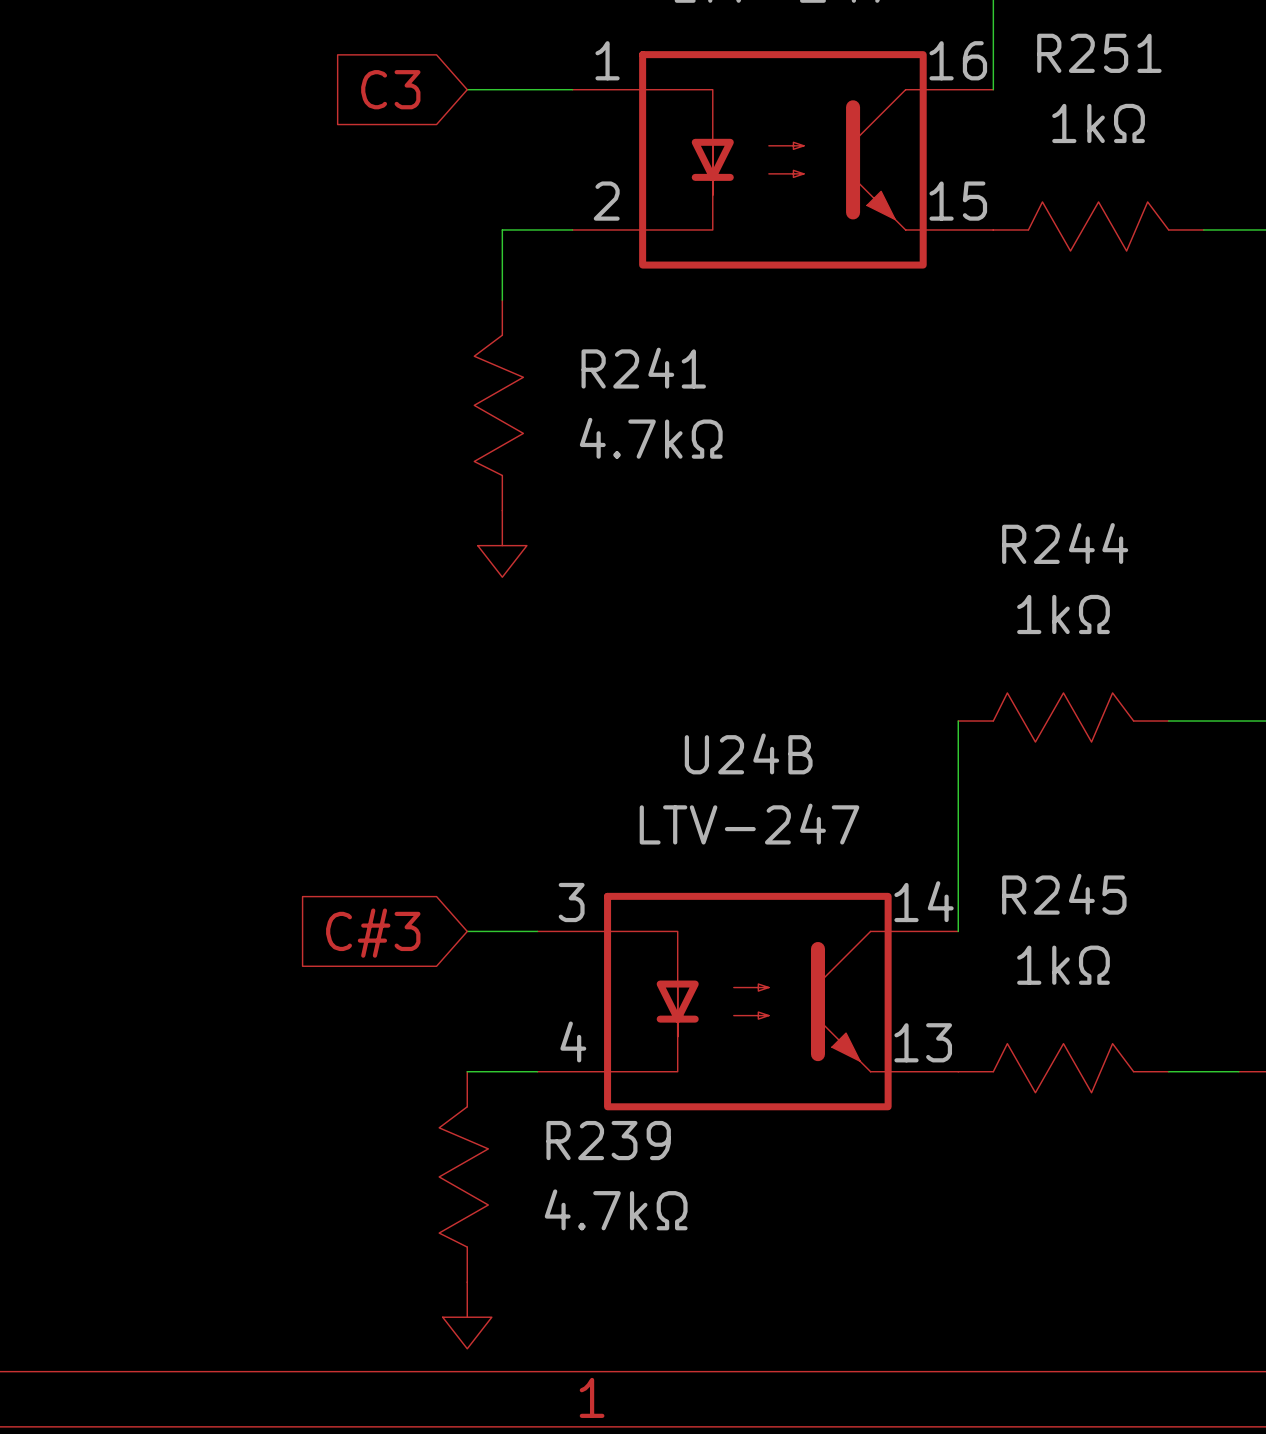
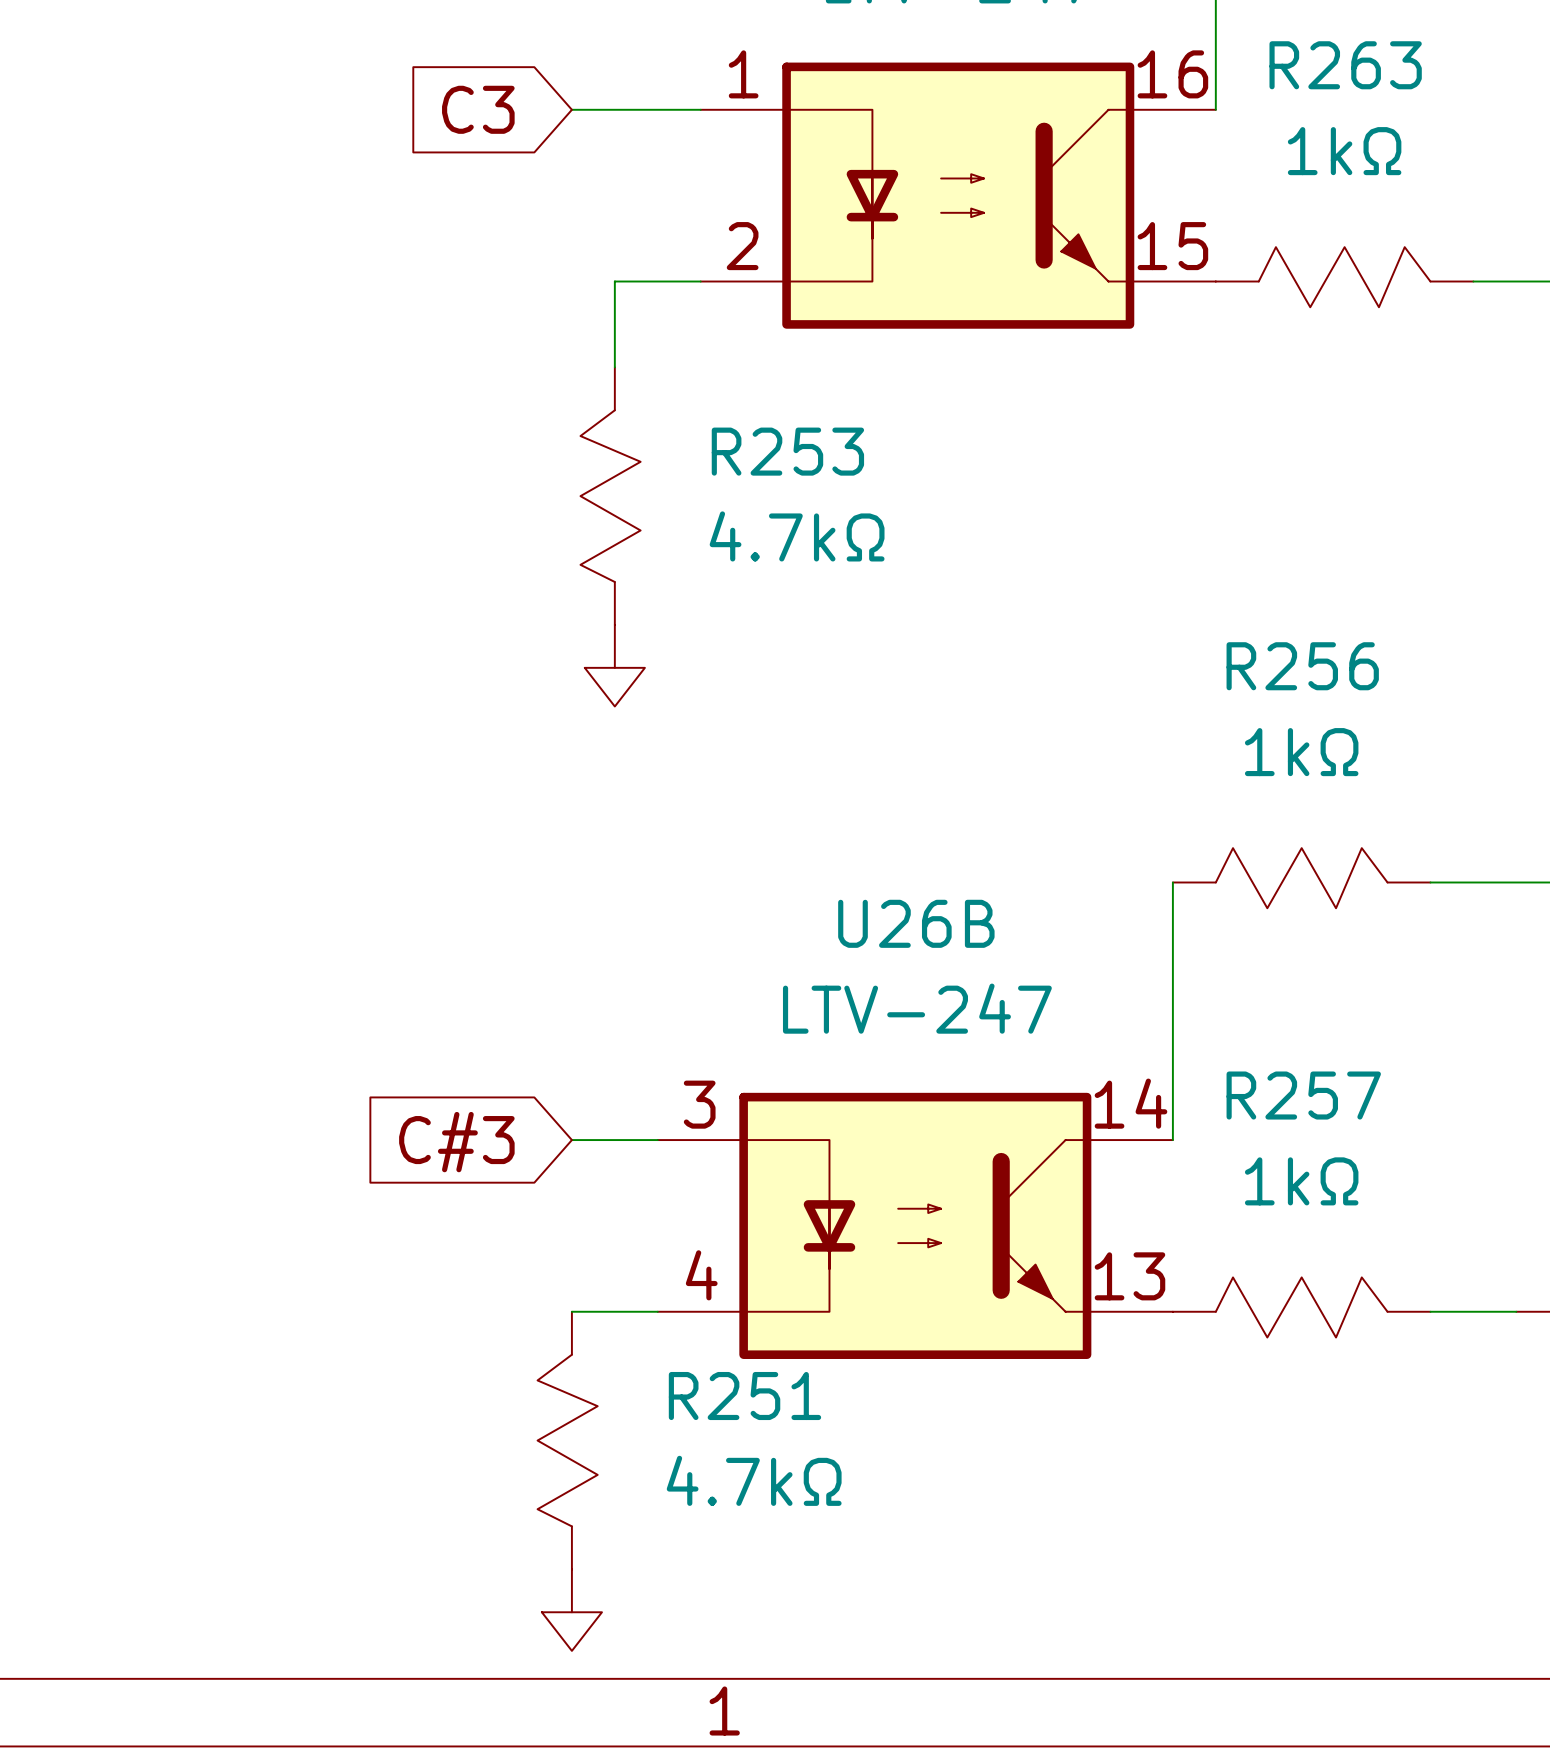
R251 name: R251 (1099, 53) -> R263 (1345, 65)
R241 name: R241 (643, 368) -> R253 (787, 451)
R244 name: R244 (1065, 543) -> R256 (1302, 666)
U24B name: U24B (748, 753) -> U26B (916, 923)
R245 name: R245 (1064, 894) -> R257 (1303, 1095)
R239 name: R239 (608, 1140) -> R251 (744, 1396)

